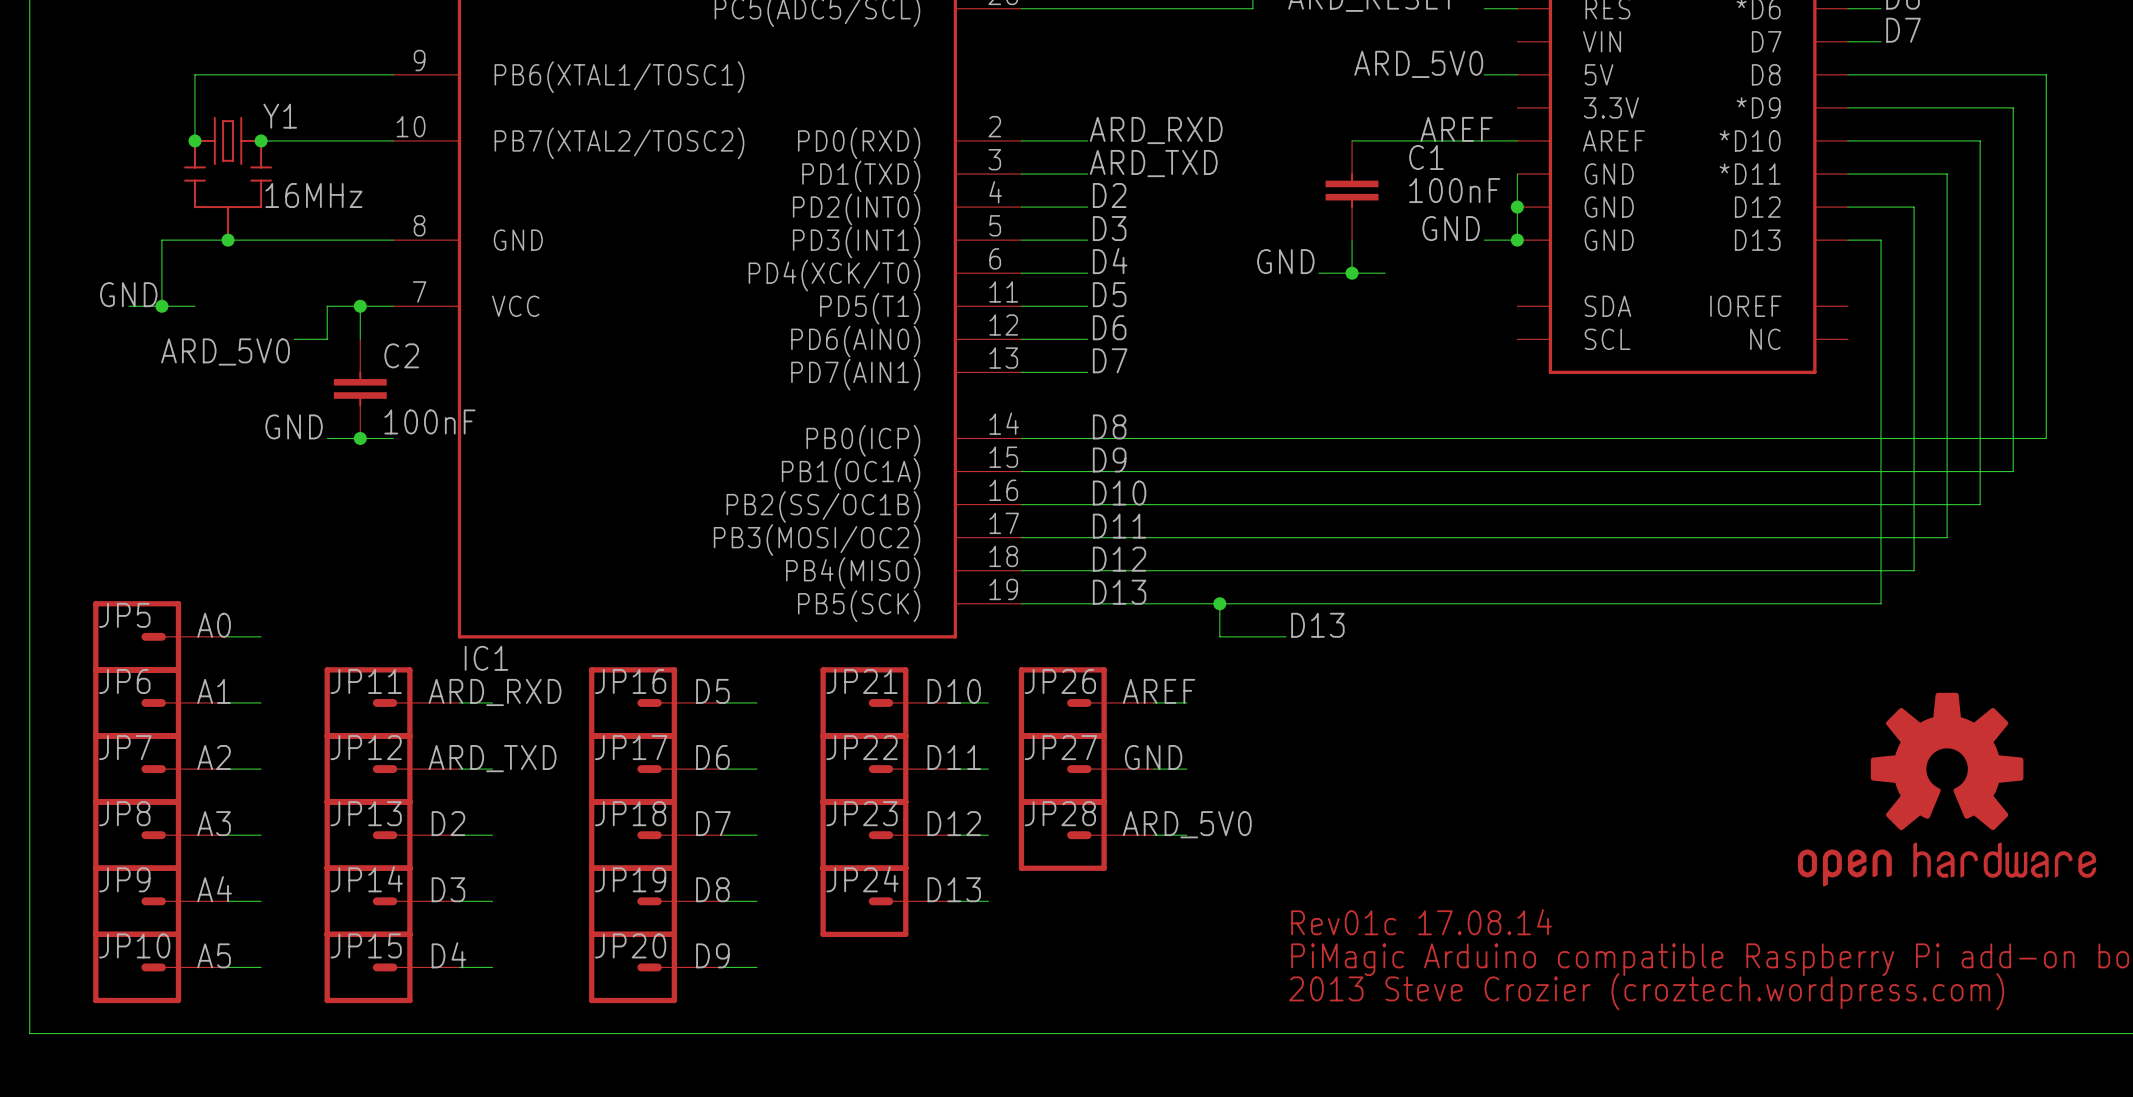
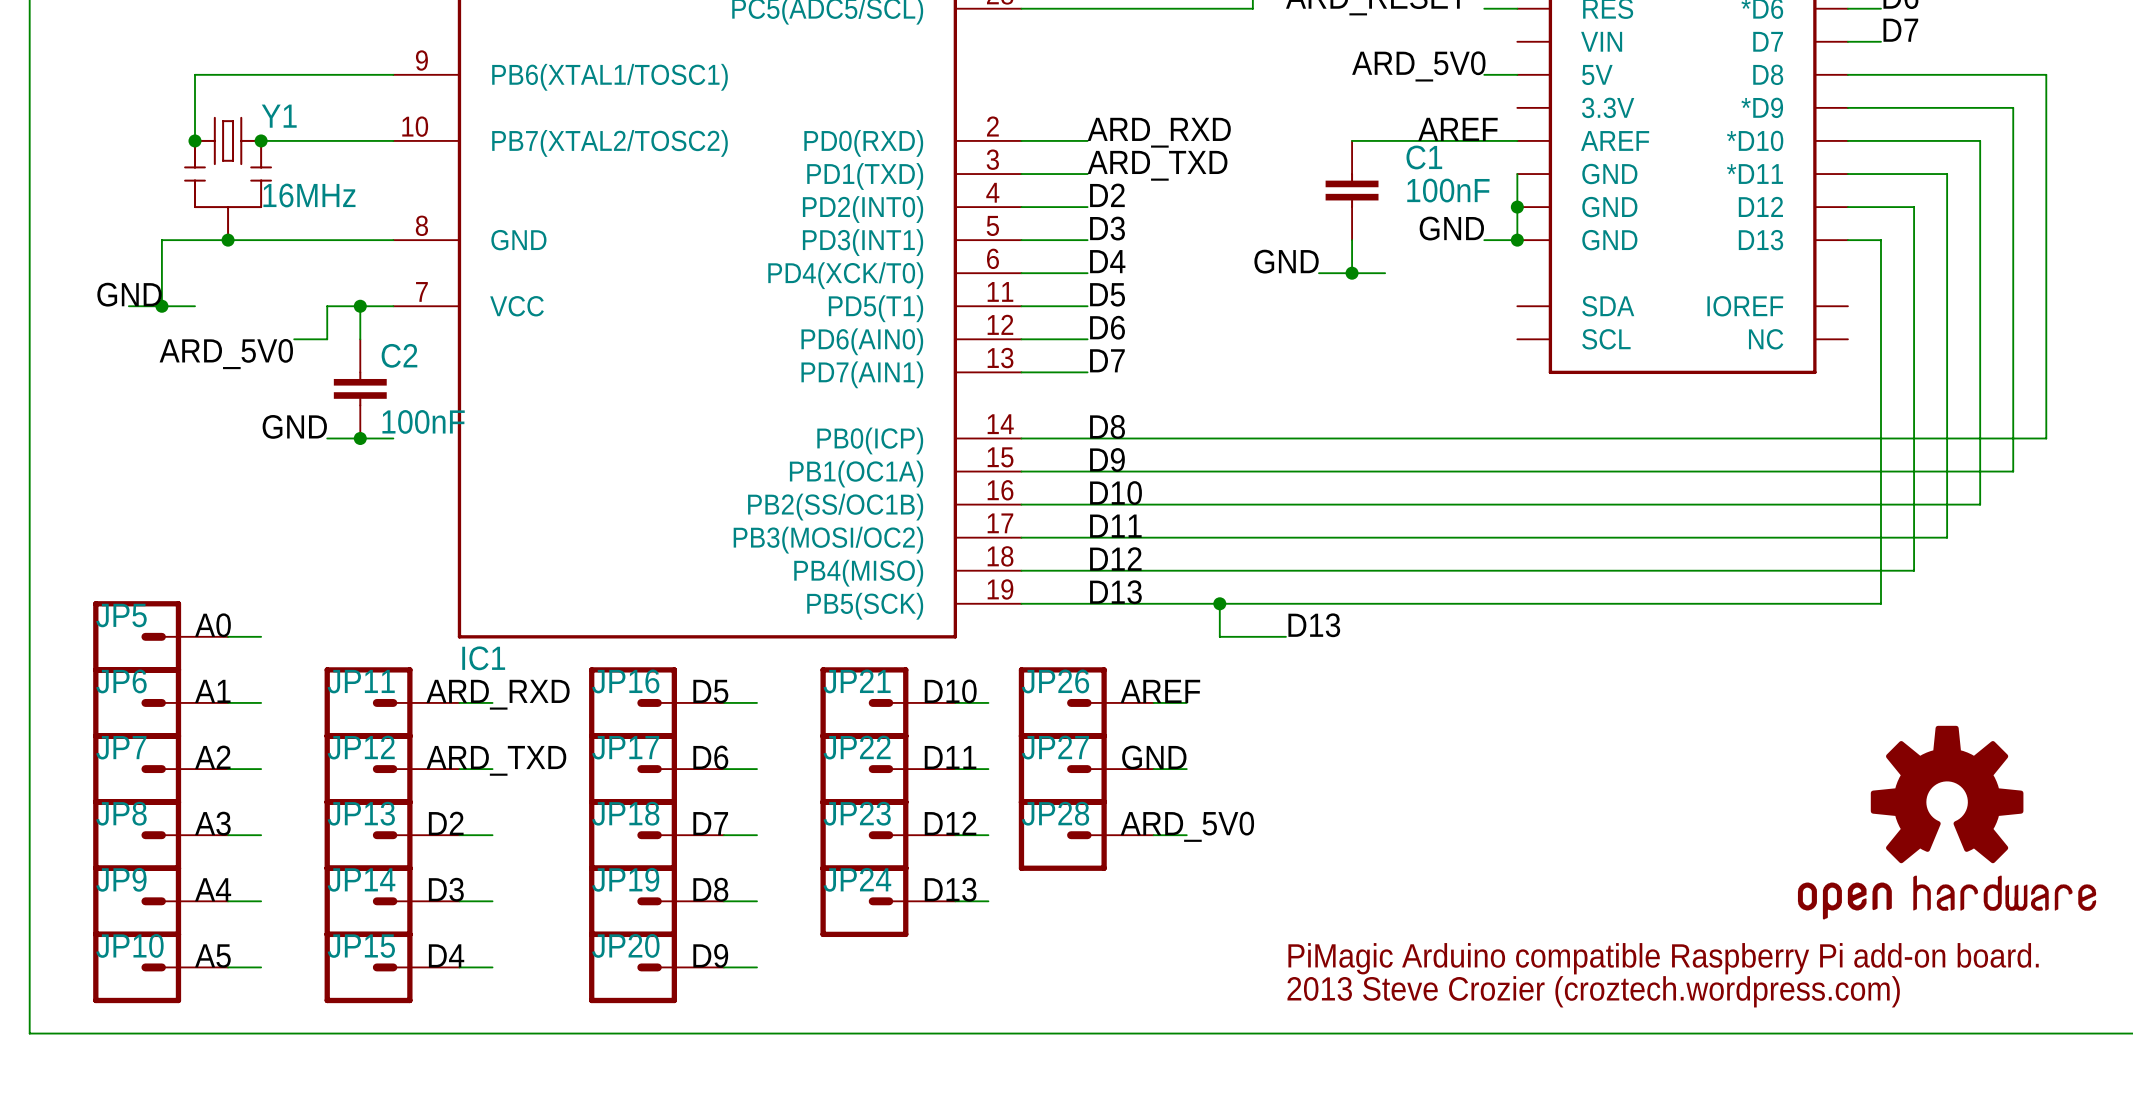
part position: (1947, 789) -> (1947, 822)
text: Rev01c 17.08.14 (1421, 922) -> none

